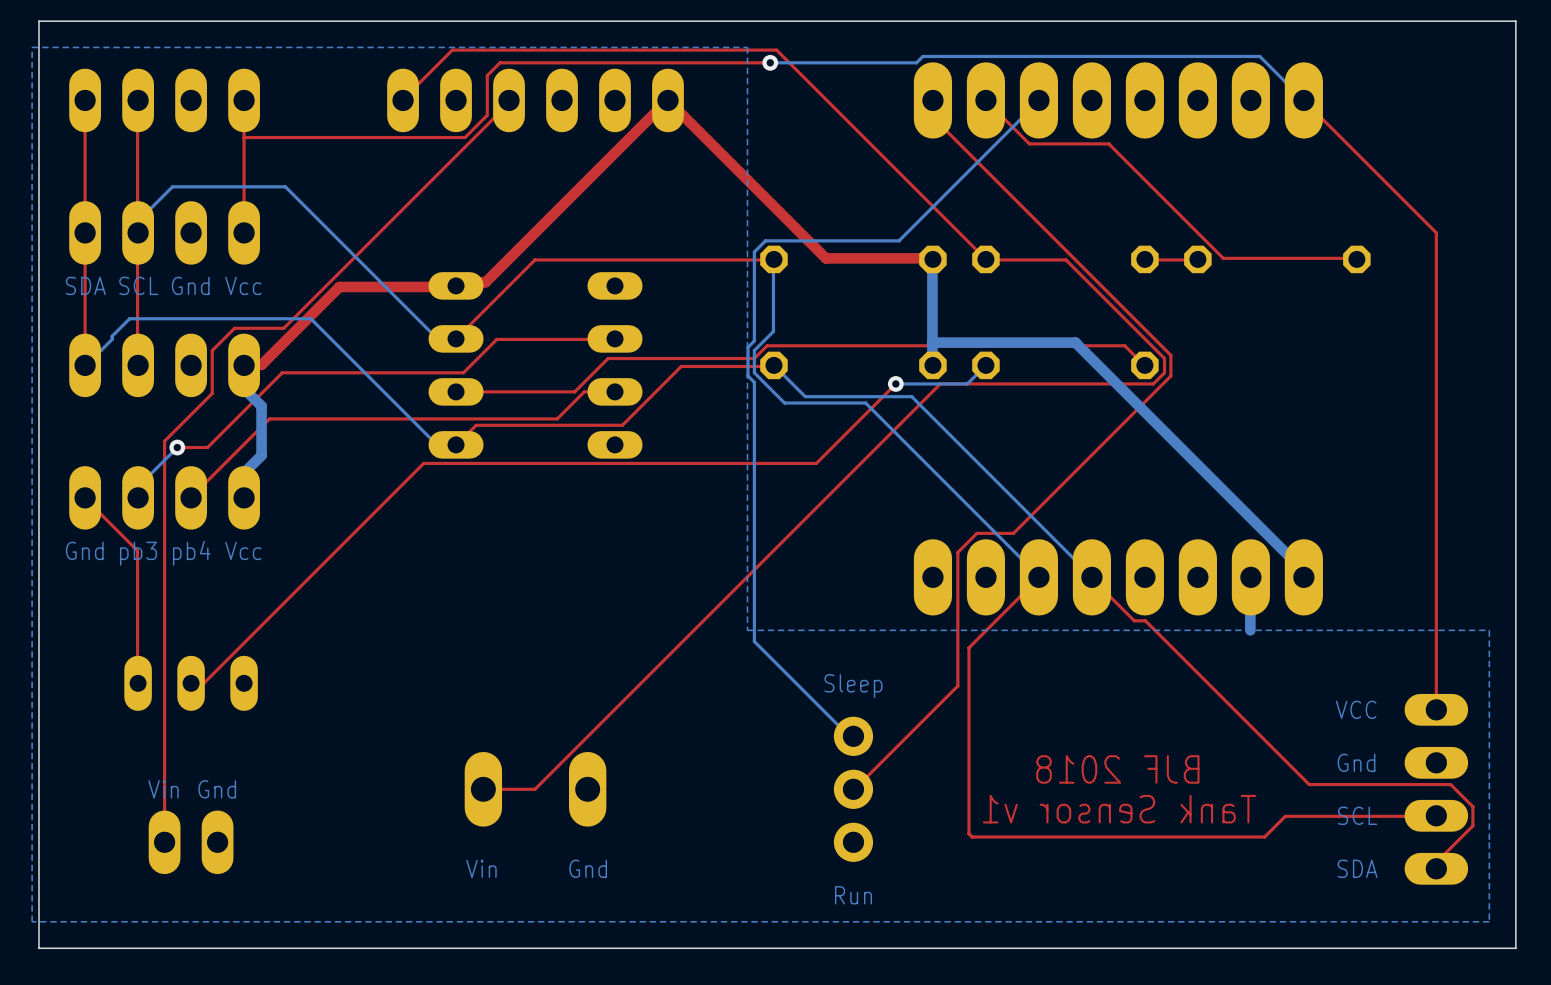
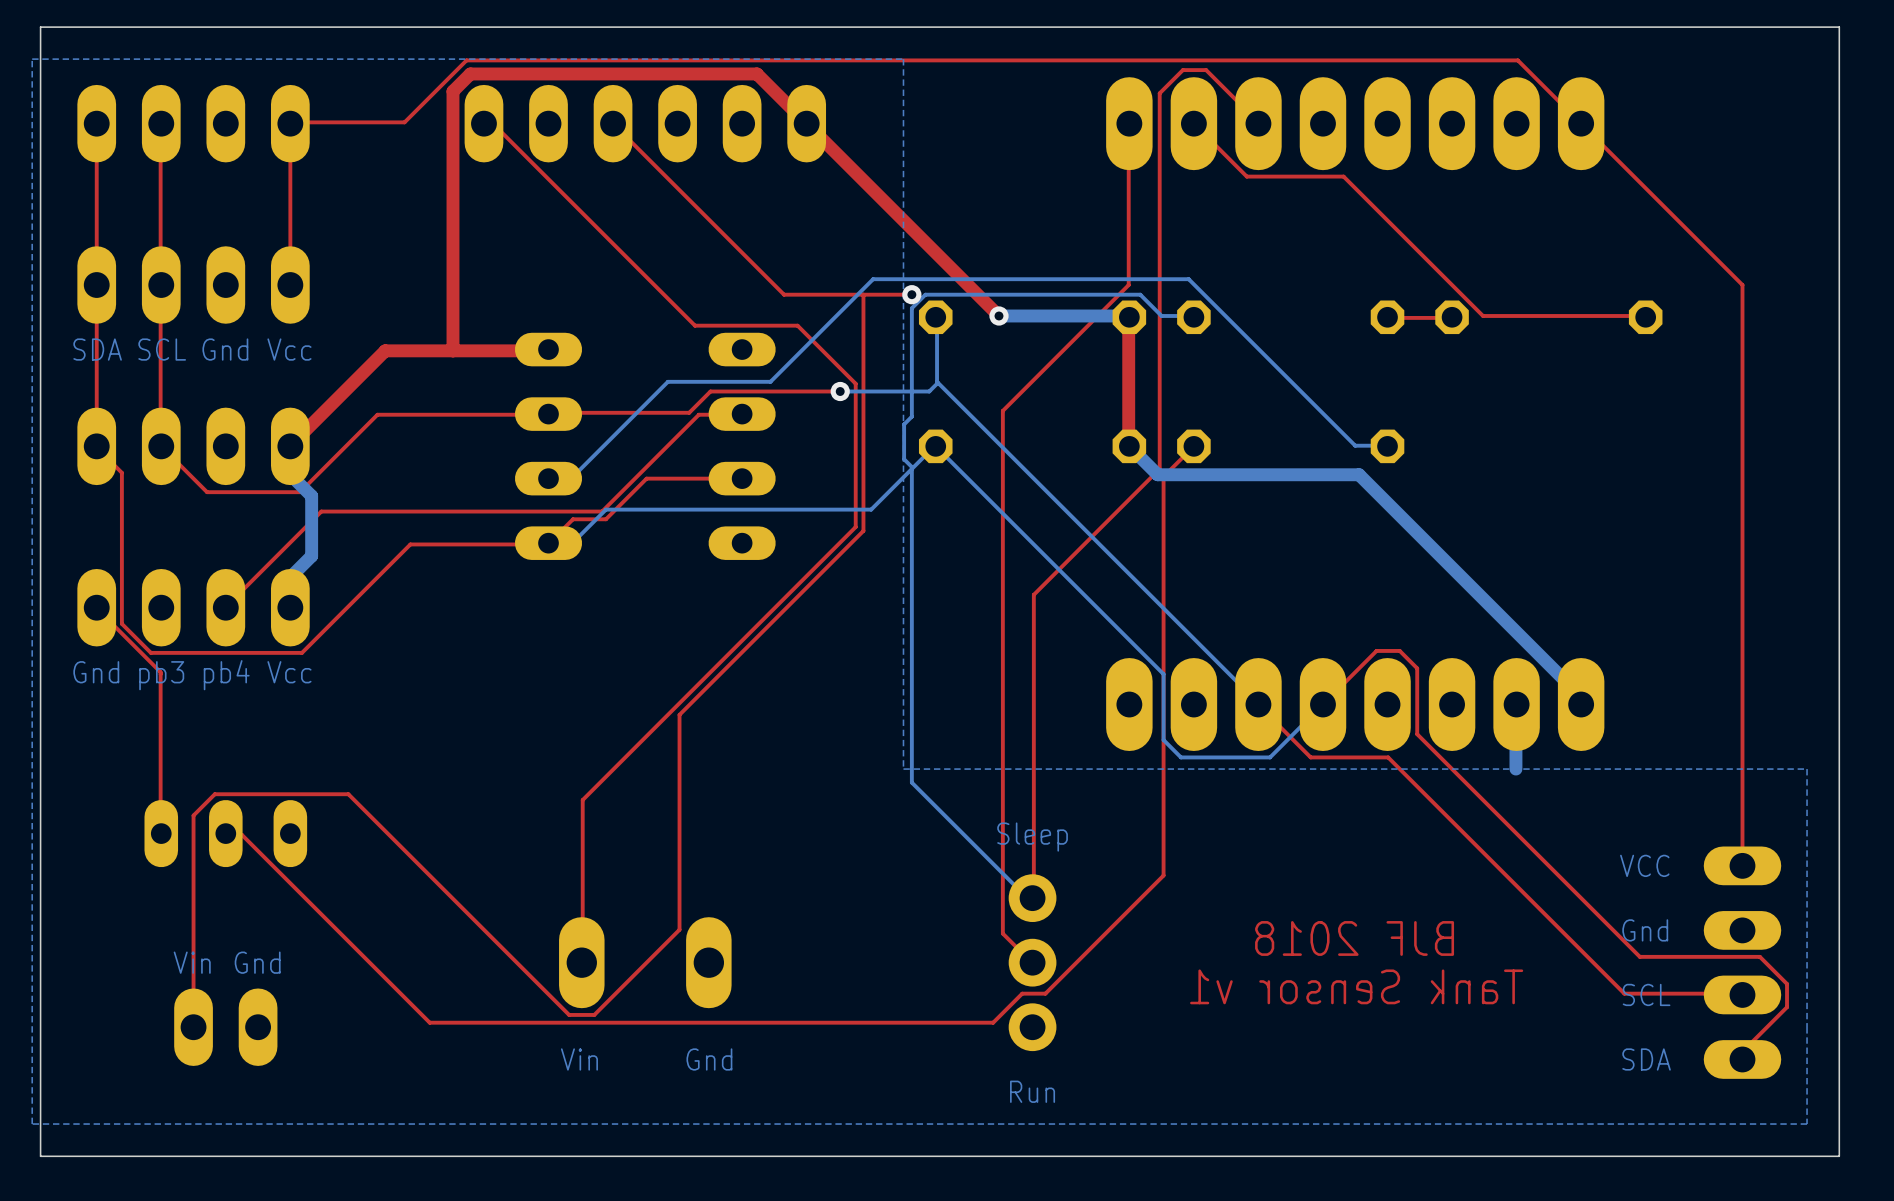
bottom track: (770, 62) (916, 62) (922, 56) (1259, 56) (1303, 100) -> none
top track: (770, 62) (500, 62) (487, 75) (487, 115) (465, 137) (244, 137) -> none
via: (770, 62) -> none
top track: (403, 100) (452, 50) (776, 50) (986, 259) (1065, 259) (1164, 358) (1164, 372) (1153, 383) (940, 383) (534, 789) (484, 789) -> (483, 123) (493, 124) (695, 325) (797, 325) (855, 383) (855, 527) (582, 800) (582, 962)
top track: (509, 100) (507, 104) (283, 328) (234, 328) (212, 350) (212, 393) (164, 441) (164, 668) -> (863, 294) (863, 530) (679, 714) (679, 929) (594, 1014) (569, 1014) (348, 794) (214, 794) (193, 815)
top track: none -> (613, 123) (784, 294) (911, 294)
top track: (668, 100) (485, 282) (460, 282) (456, 285) -> (806, 123) (756, 73) (470, 73) (452, 91) (452, 350)
top track: (932, 100) (934, 118) (1170, 355) (1170, 375) (1013, 533) (976, 533) (957, 552) (957, 685) (853, 789) -> (1129, 123) (1128, 285) (1002, 410) (1002, 933) (1032, 962)
bottom track: (1038, 100) (899, 240) -> (1193, 317) (1161, 315) (1140, 294) (1088, 294)
top track: none -> (1258, 123) (1206, 70) (1182, 70) (1159, 93) (1159, 468) (1033, 594) (1032, 898)
top track: none -> (1581, 123) (1517, 60) (466, 60) (404, 122) (290, 123)
bottom track: (138, 232) (139, 220) (172, 186) (285, 186) (436, 337) (456, 338) -> none
via: none -> (911, 294)
top track: (825, 258) (932, 259) -> (1129, 446) (1129, 317)
via: none -> (998, 315)
bottom track: (773, 259) (773, 331) (754, 350) (754, 372) (784, 403) (865, 403) -> (935, 317) (937, 381) (1047, 492)
top track: (773, 259) (534, 259) (457, 337) -> (840, 391) (710, 391) (689, 412) (549, 412)
bottom track: (932, 259) (932, 365) -> (1129, 317) (998, 315)
top track: (339, 286) (261, 364) (244, 364) -> (406, 350) (385, 350) (290, 445)
bottom track: none -> (938, 382) (929, 391) (840, 391)
via: none -> (840, 391)
top track: (579, 339) (496, 339) (463, 372) (282, 372) -> (548, 414) (377, 414) (336, 455)
bottom track: (932, 342) (1075, 342) (1121, 388) -> (1129, 446) (1157, 474) (1359, 474)
bottom track: (85, 365) (112, 339) (112, 336) (129, 318) (310, 318) (436, 444) (456, 444) -> (935, 446) (871, 509) (605, 509) (573, 542) (548, 543)
top track: none -> (96, 446) (121, 472) (121, 623) (150, 652) (301, 652) (410, 544) (548, 543)
top track: (773, 365) (681, 366) (622, 425) (503, 425) -> none
bottom track: (985, 365) (967, 383) (895, 383) -> none
bottom track: none -> (1387, 446) (1355, 445) (1188, 279) (873, 279) (770, 381) (667, 381) (578, 470) (557, 470) (548, 478)
top track: (1144, 365) (1124, 345) (767, 345) (754, 358) (608, 358) (574, 391) -> (704, 478) (693, 478)
top track: (895, 383) (816, 463) (423, 463) (204, 682) (191, 683) -> (1193, 446) (1163, 476) (1163, 875) (1045, 993) (1022, 993) (993, 1022) (429, 1022) (241, 834) (225, 833)
via: (895, 383) -> none
top track: (536, 391) (456, 391) -> (646, 478) (605, 519)
top track: (584, 391) (557, 418) (500, 418) -> (698, 414) (602, 511)
bottom track: (805, 396) (911, 396) (1091, 577) -> (973, 484) (1163, 674) (1163, 740) (1181, 757) (1270, 757) (1322, 704)
top track: (252, 403) (207, 447) (177, 447) -> (300, 492) (207, 492) (161, 446)
bottom track: (177, 447) (139, 485) (138, 497) -> none
via: (177, 447) -> none
top track: (1038, 577) (968, 647) (968, 833) (972, 837) (1264, 837) (1285, 816) (1436, 815) -> none
top track: (1091, 577) (1134, 620) -> (1258, 705) (1310, 757) (1374, 757)
top track: none -> (1322, 704) (1376, 650) (1399, 650) (1417, 668) (1417, 734) (1639, 956)
top track: (1352, 784) (1309, 784) -> (1742, 994) (1624, 993) (1587, 956)

